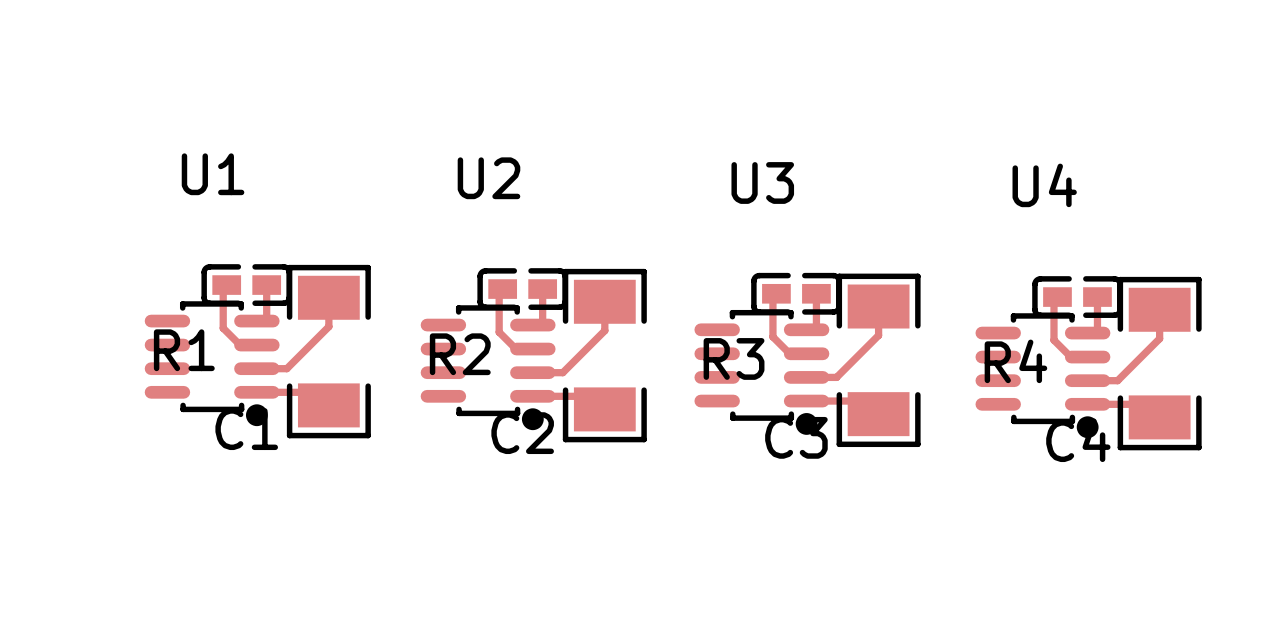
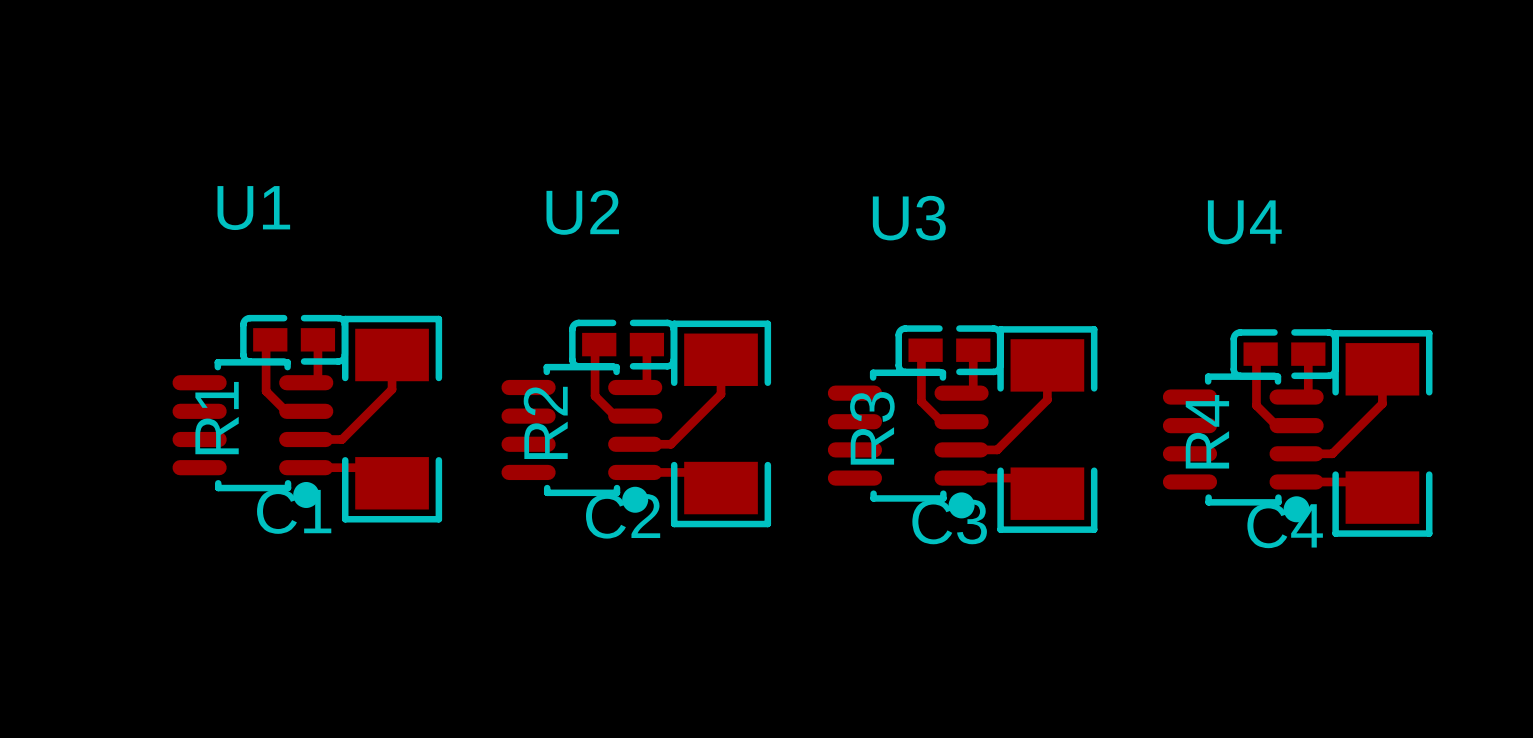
R1 name rotation: 0° (184, 350) -> 90° counterclockwise (217, 418)
R2 name rotation: 0° (460, 354) -> 90° counterclockwise (545, 422)
R3 name rotation: 0° (734, 358) -> 90° counterclockwise (872, 428)
R4 name rotation: 0° (1015, 361) -> 90° counterclockwise (1207, 431)

